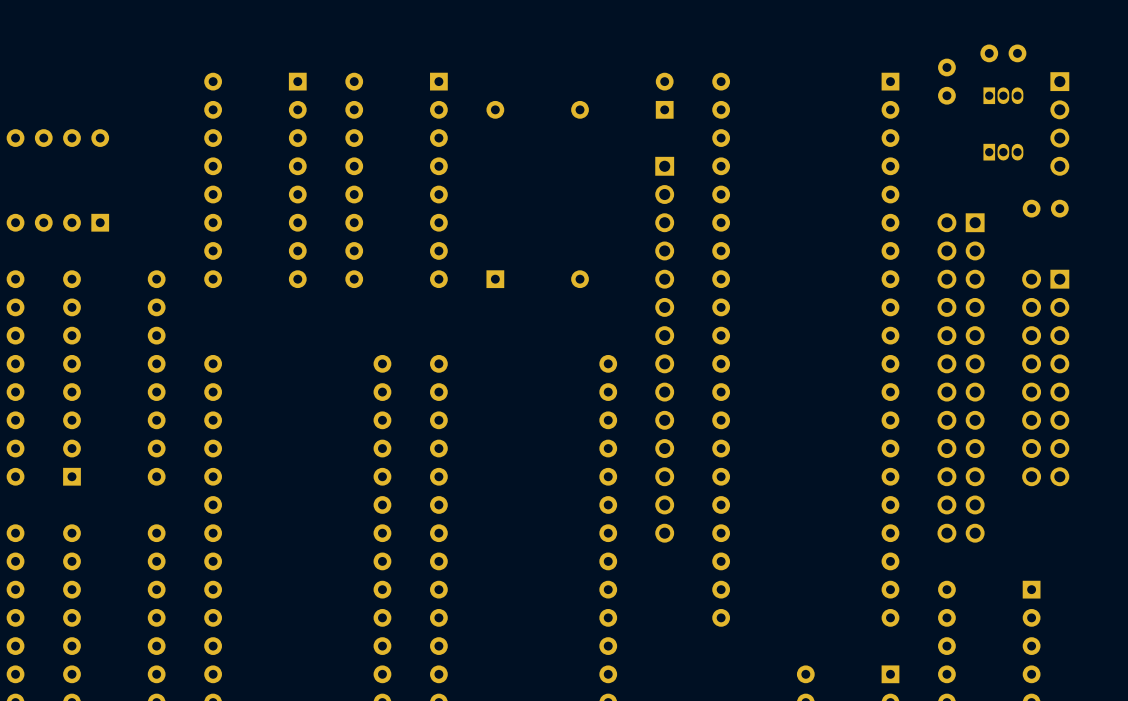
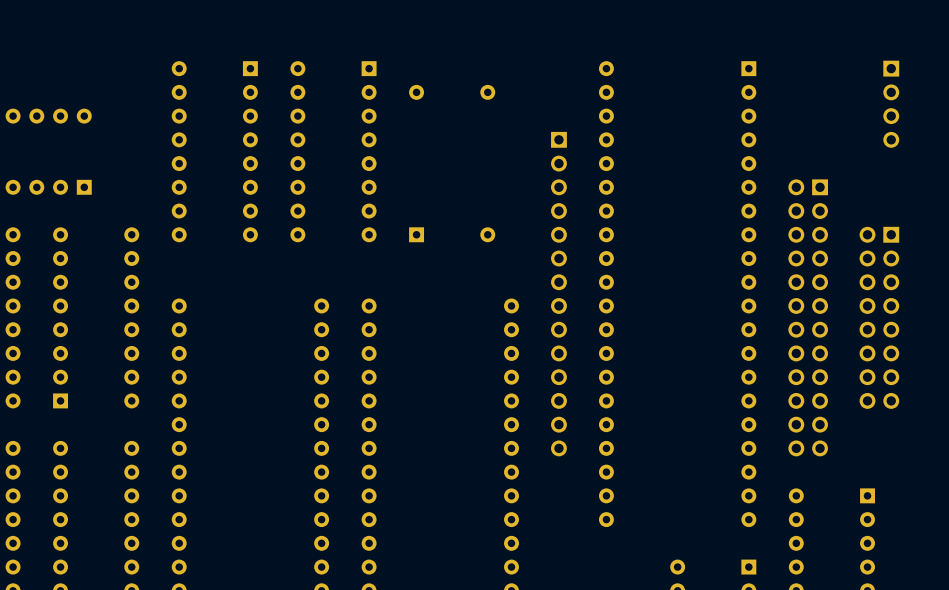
part: (1003, 53) -> none
part: (946, 81) -> none
part: (664, 95) -> none
part: (1003, 95) -> none
part: (1003, 152) -> none
part: (1045, 208) -> none

